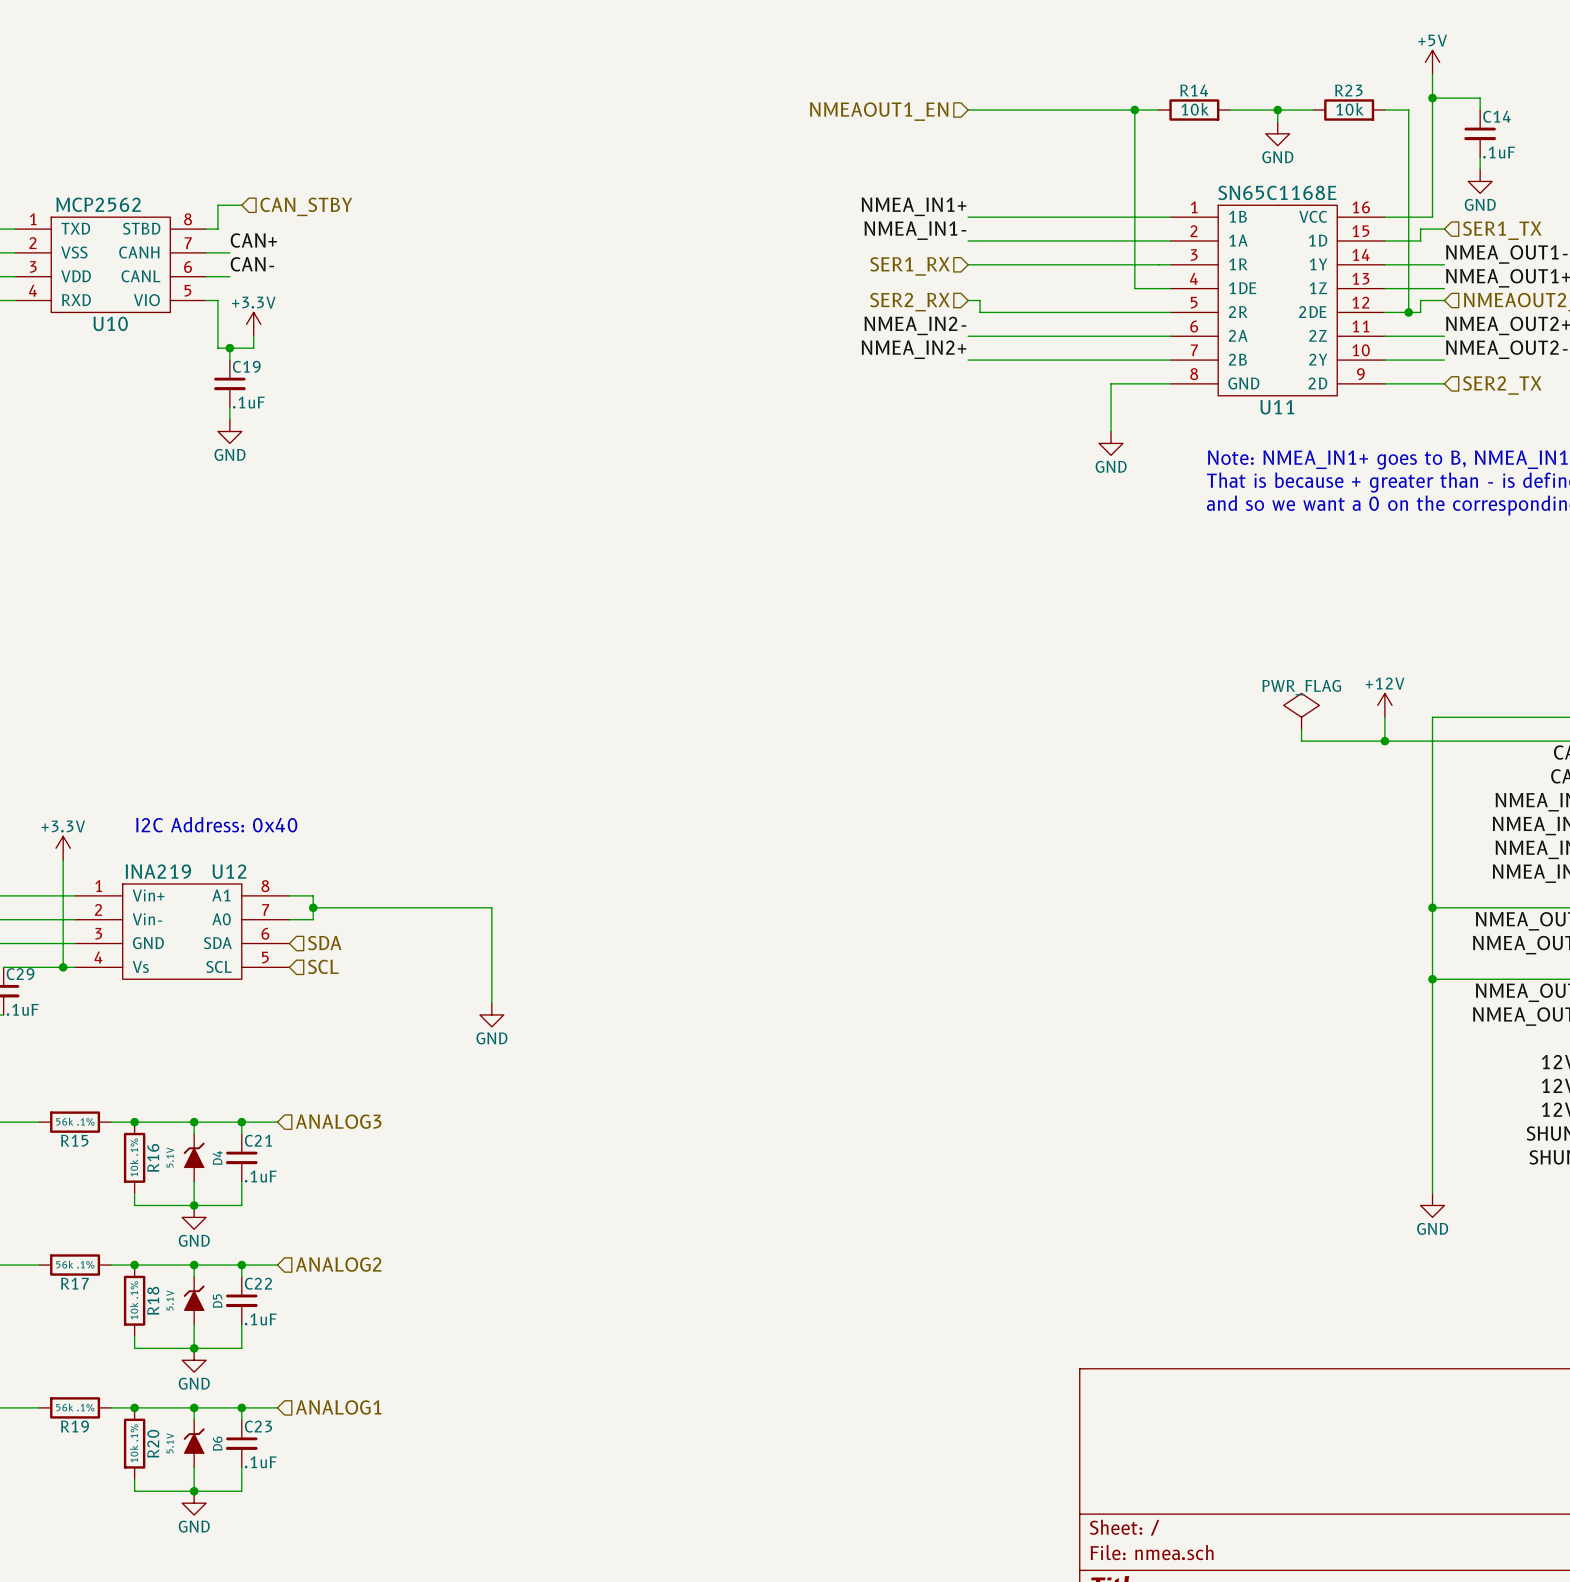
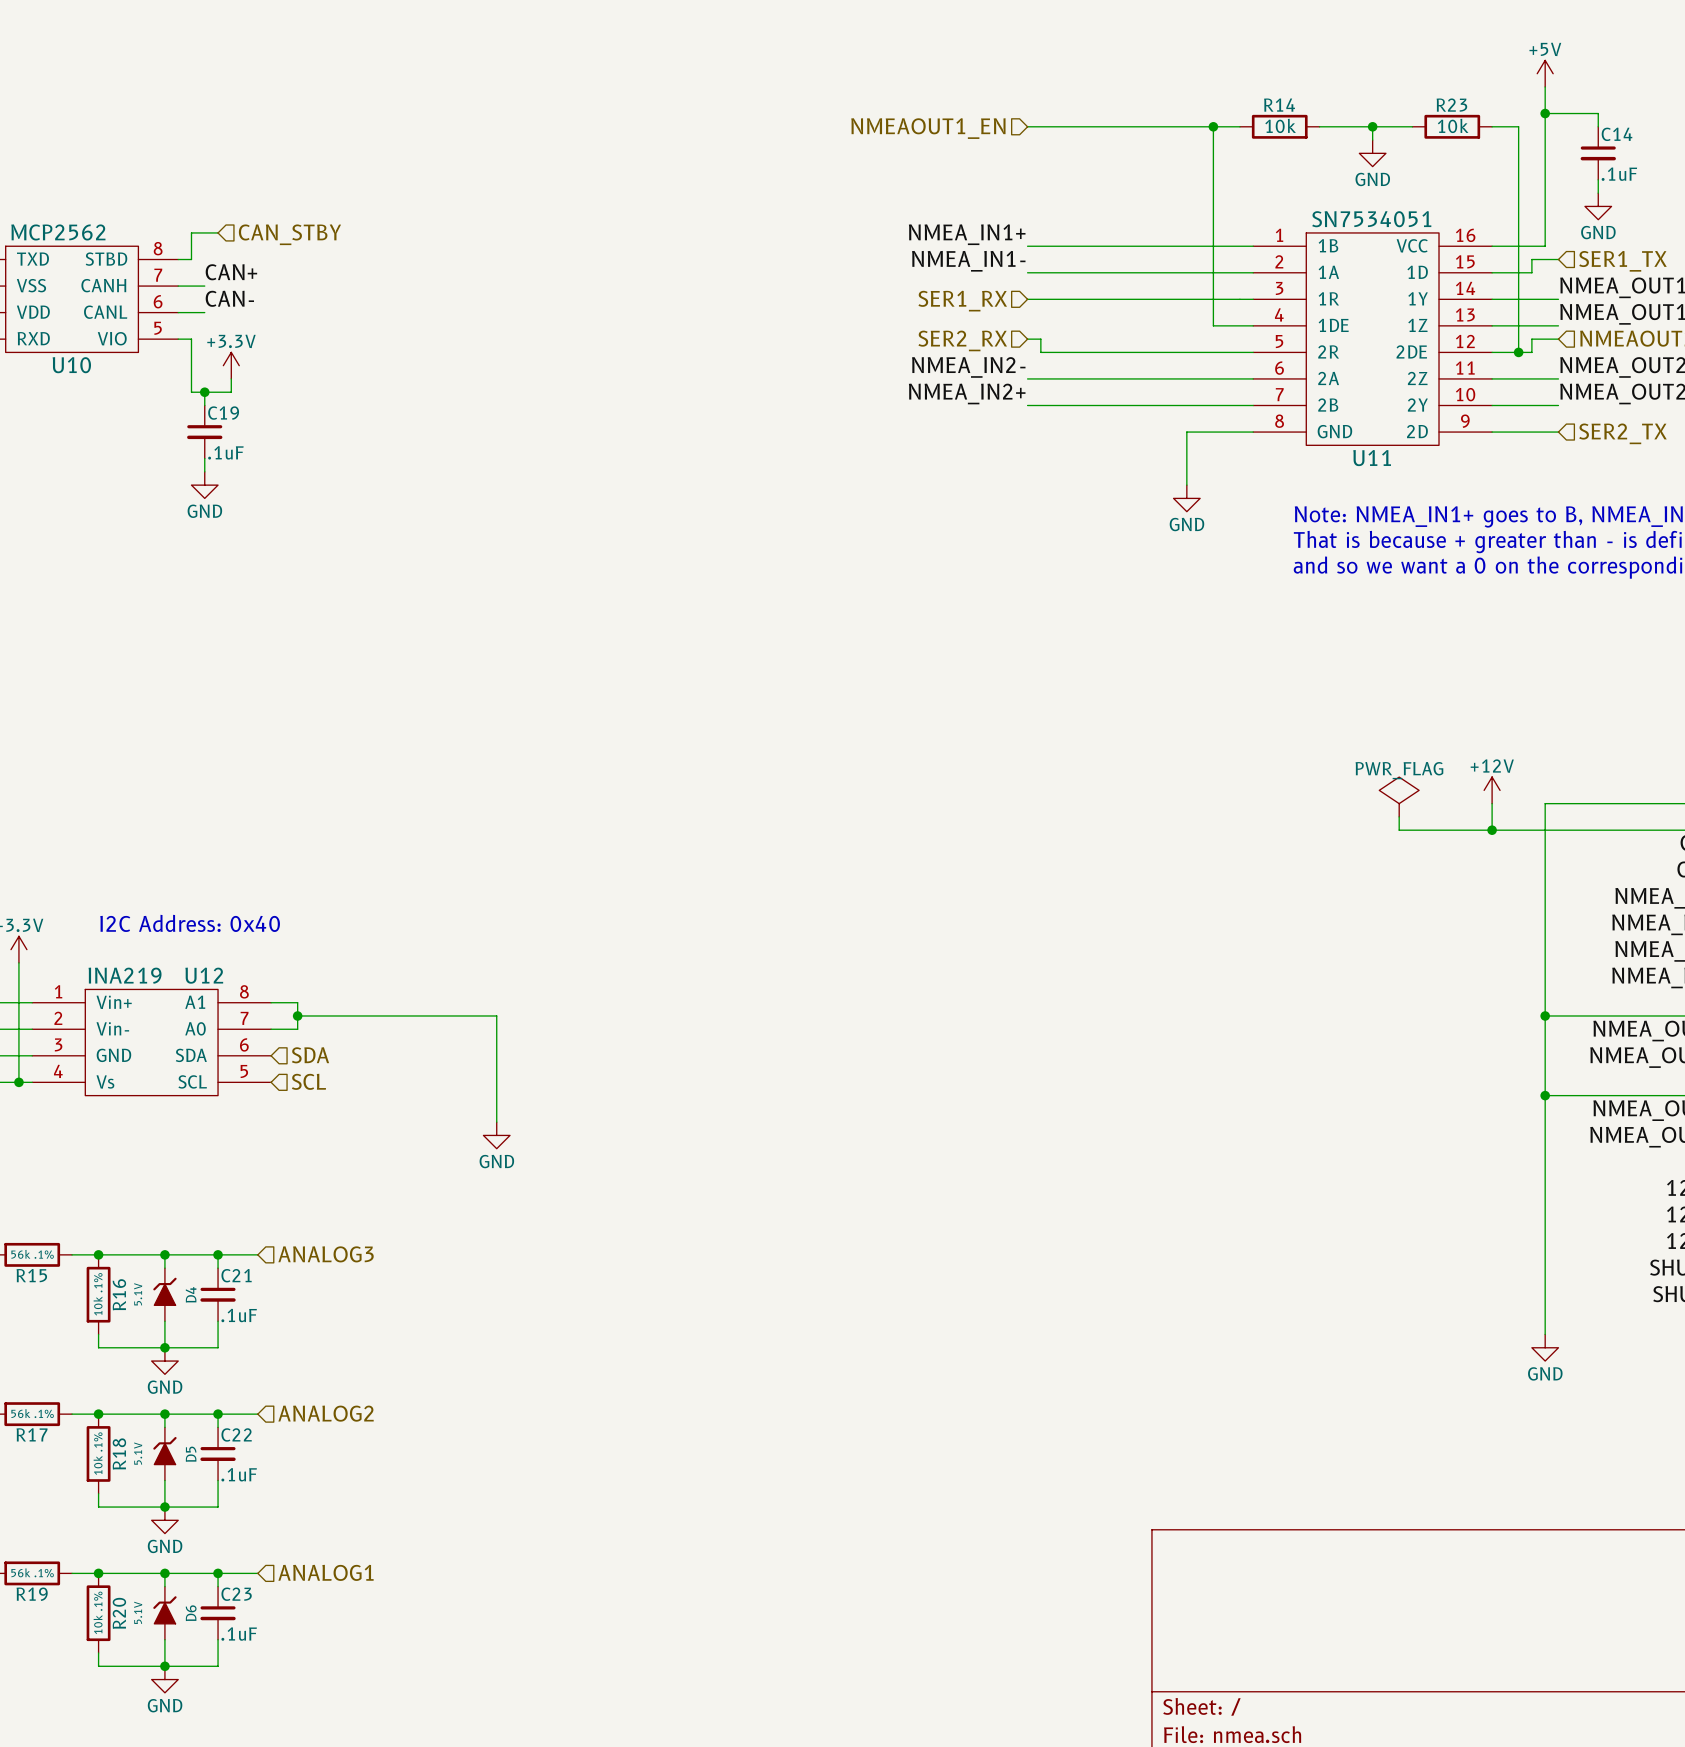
U11 value: SN65C1168E (1277, 192) -> SN7534051 (1371, 219)

